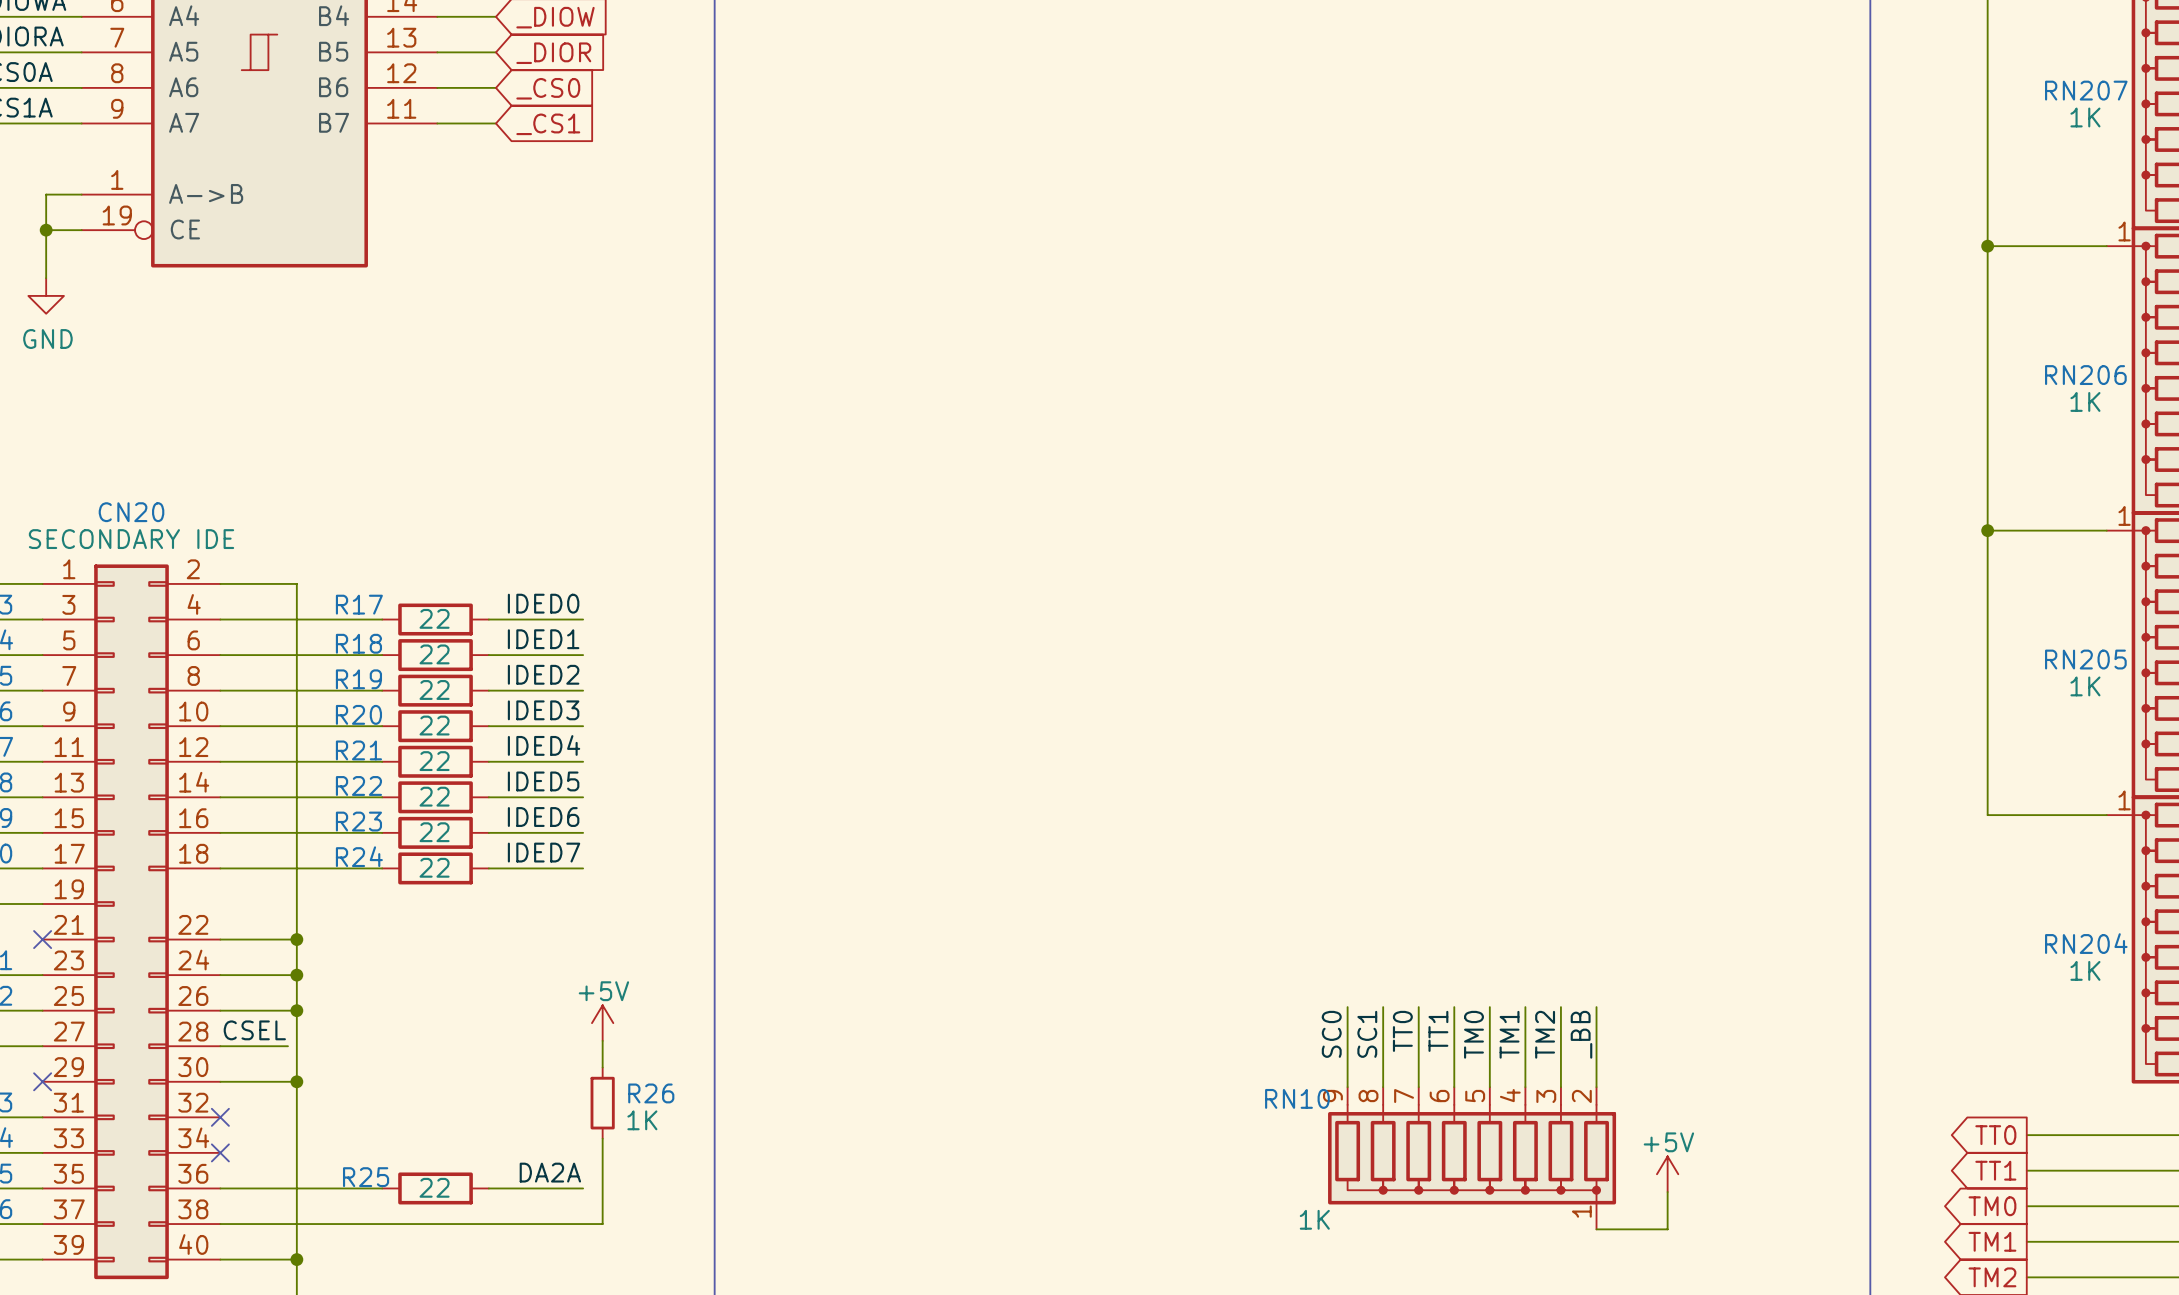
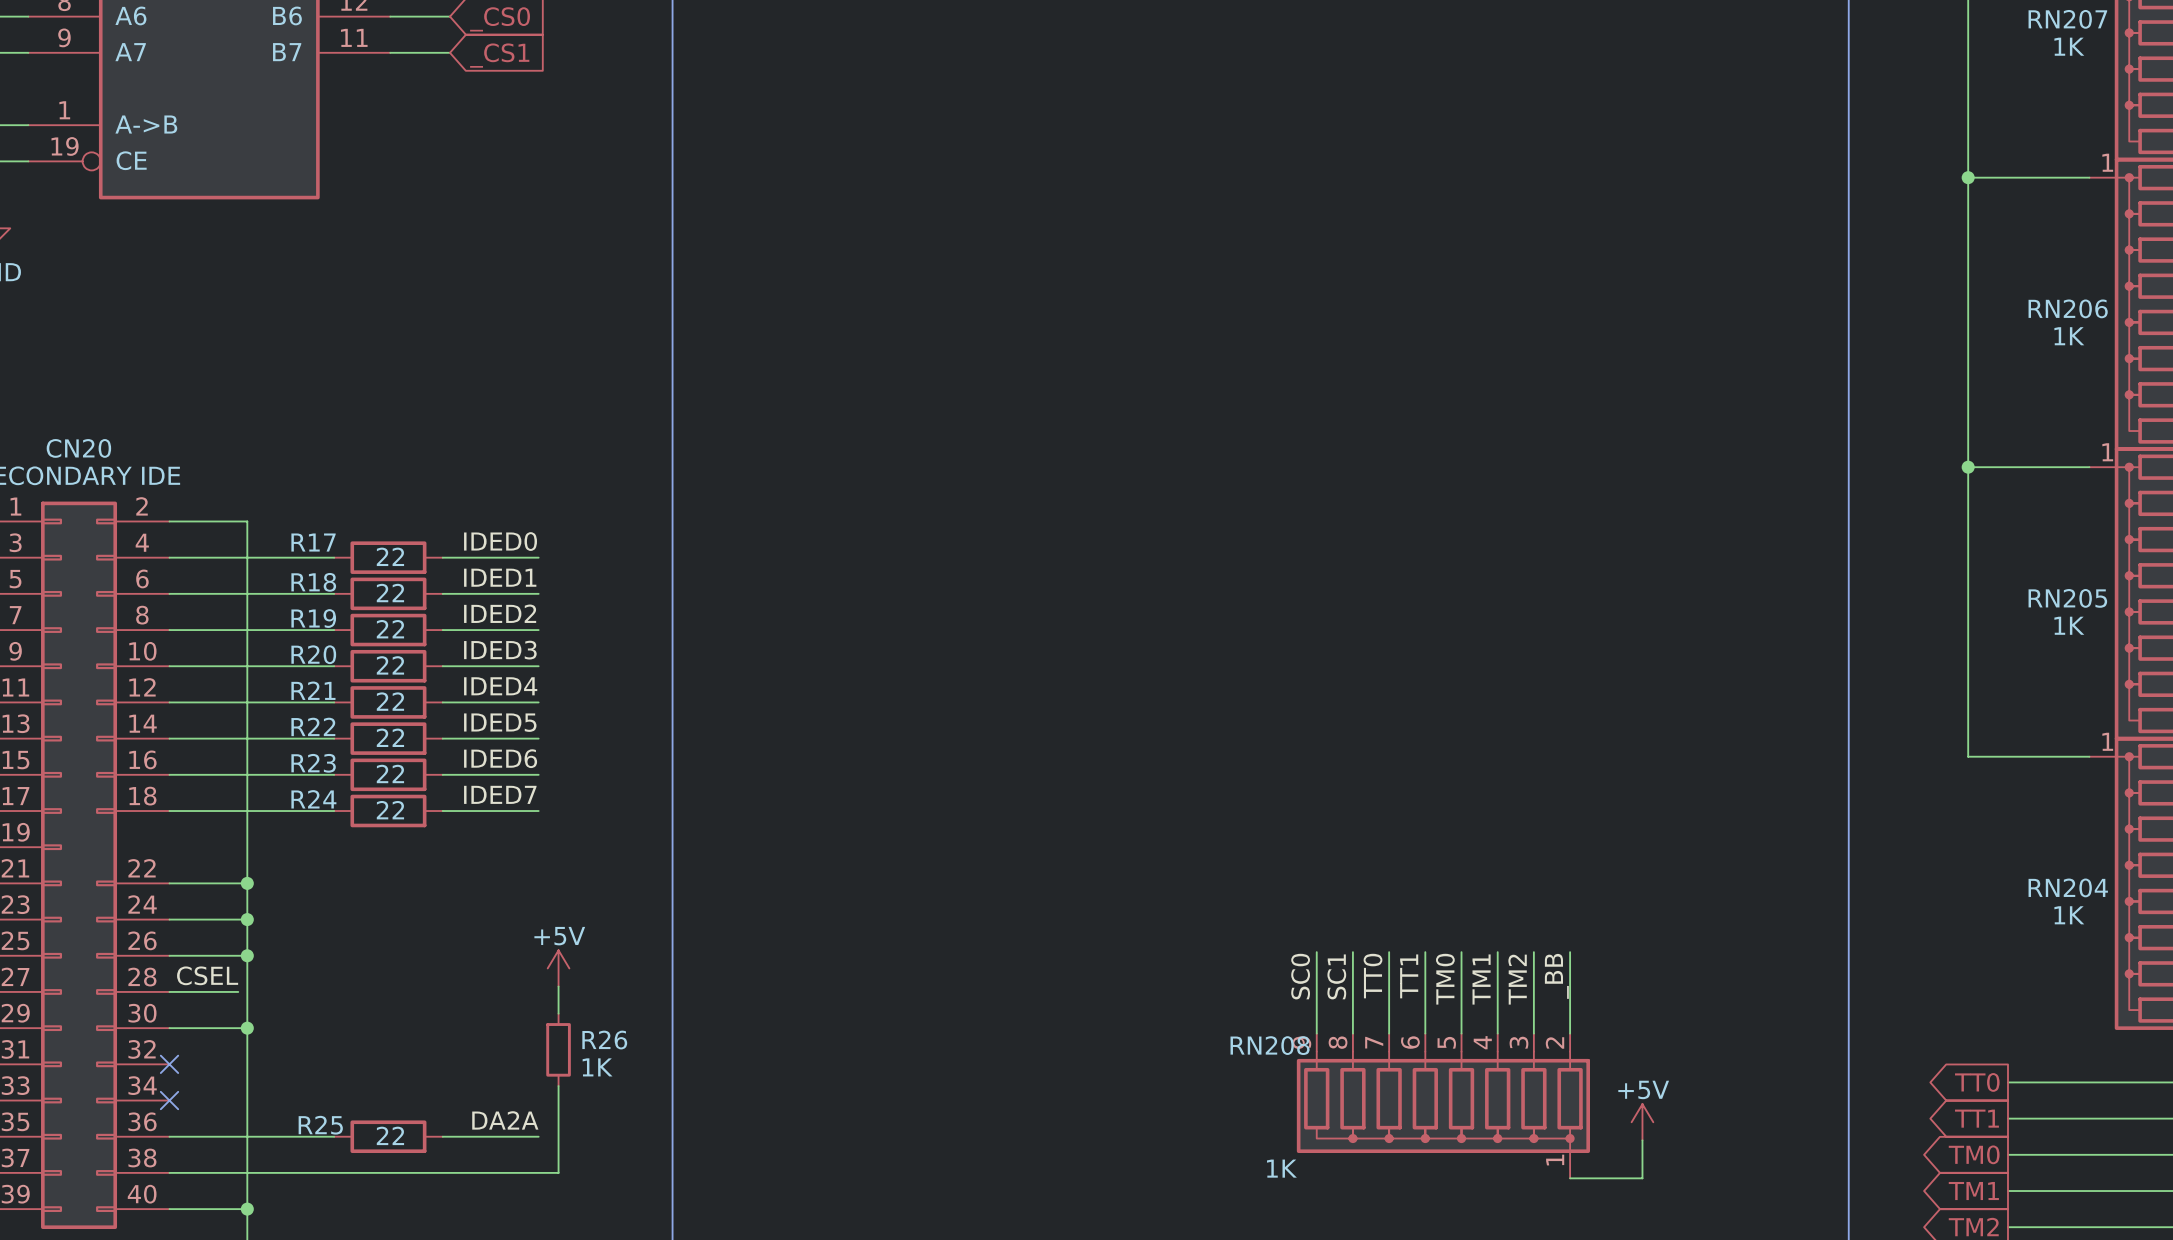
RN10 name: RN10 (1297, 1098) -> RN208 (1270, 1045)

